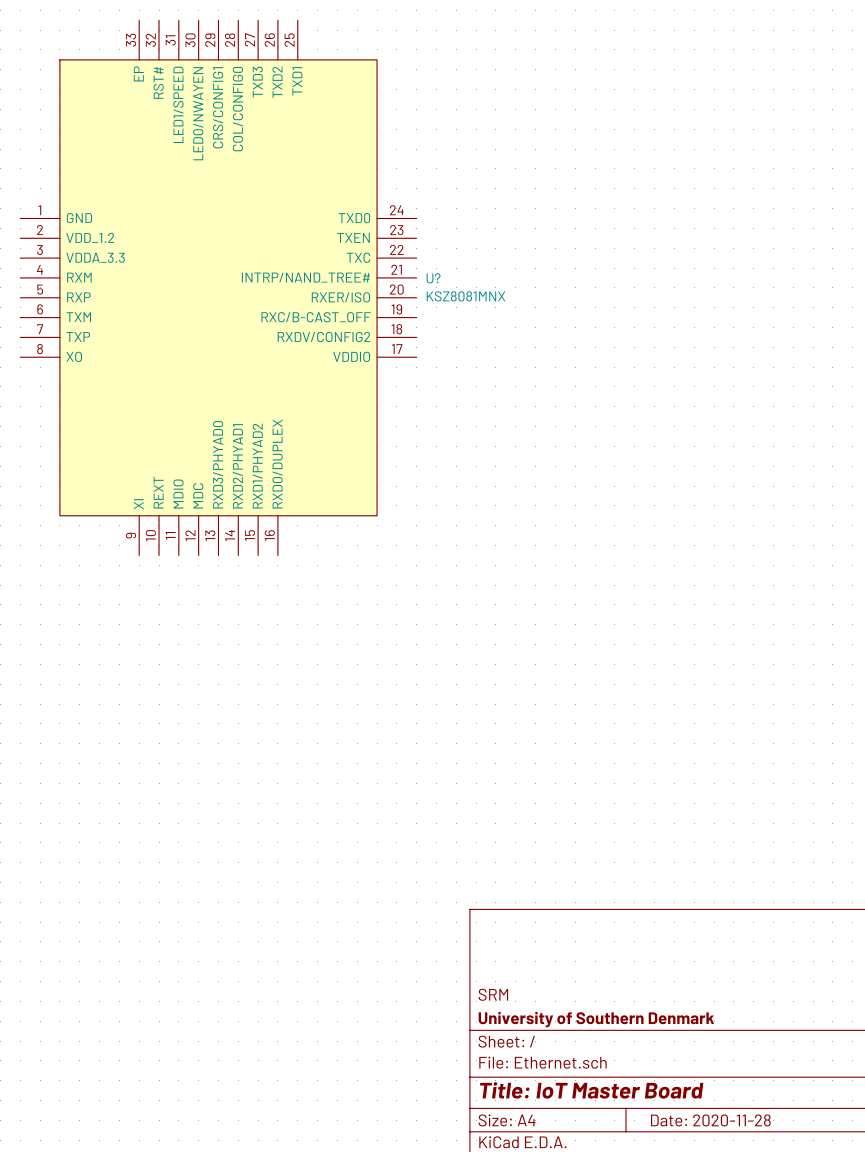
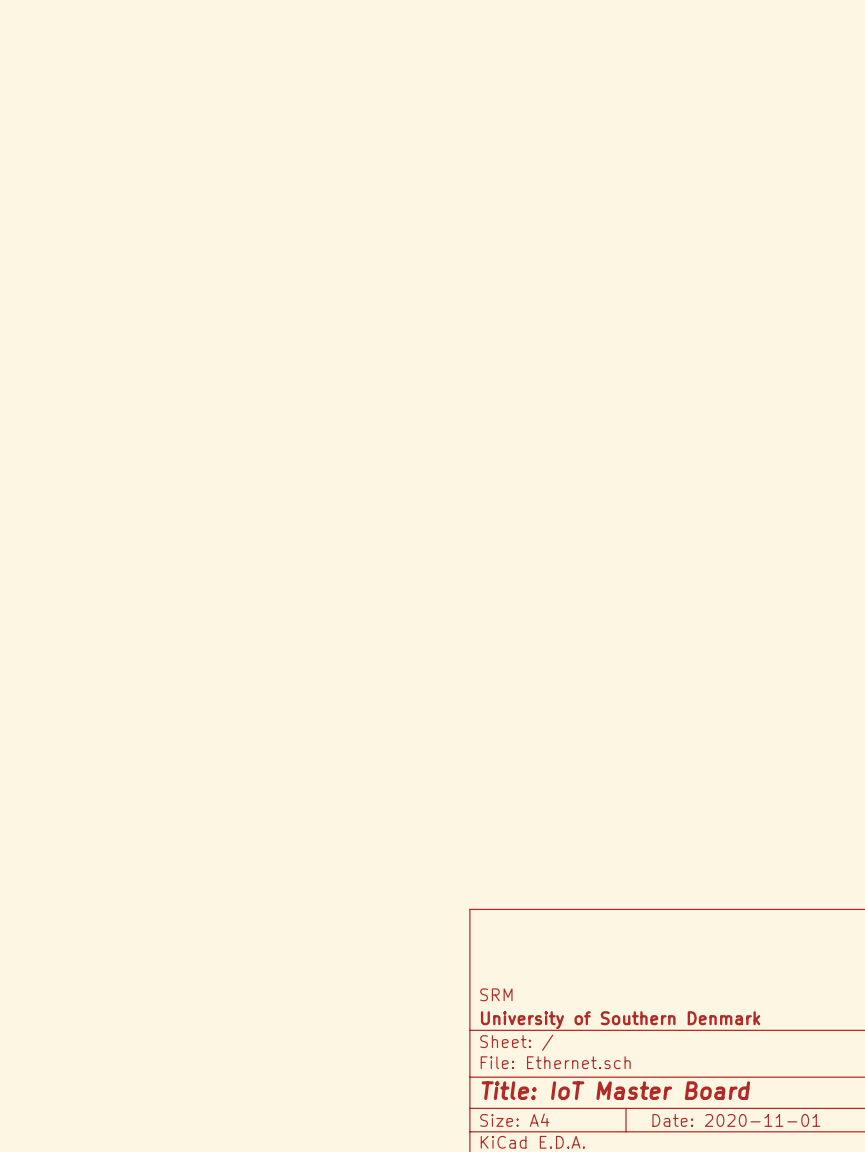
U?: KSZ8081MNX (218, 287) -> none
title block: Date: 2020-11-28 (710, 1120) -> Date: 2020-11-01 (736, 1120)

